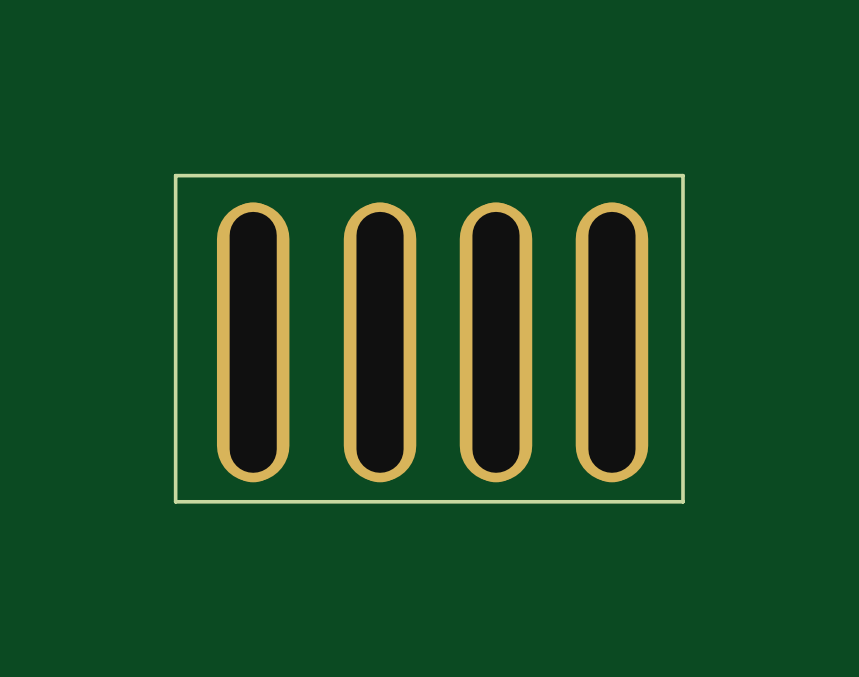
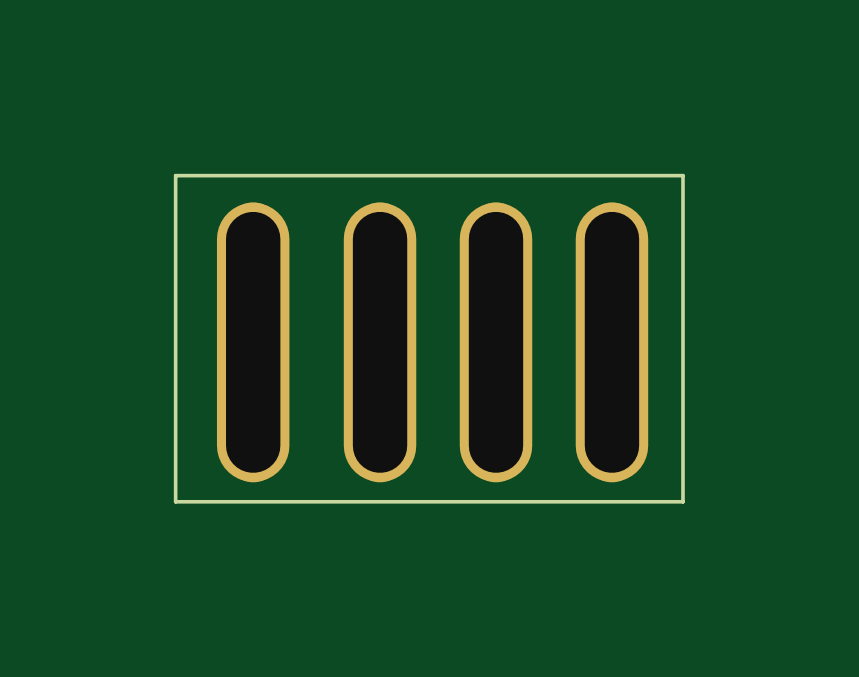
part footprint: [216, 202, 649, 483] -> [216, 202, 649, 483]

